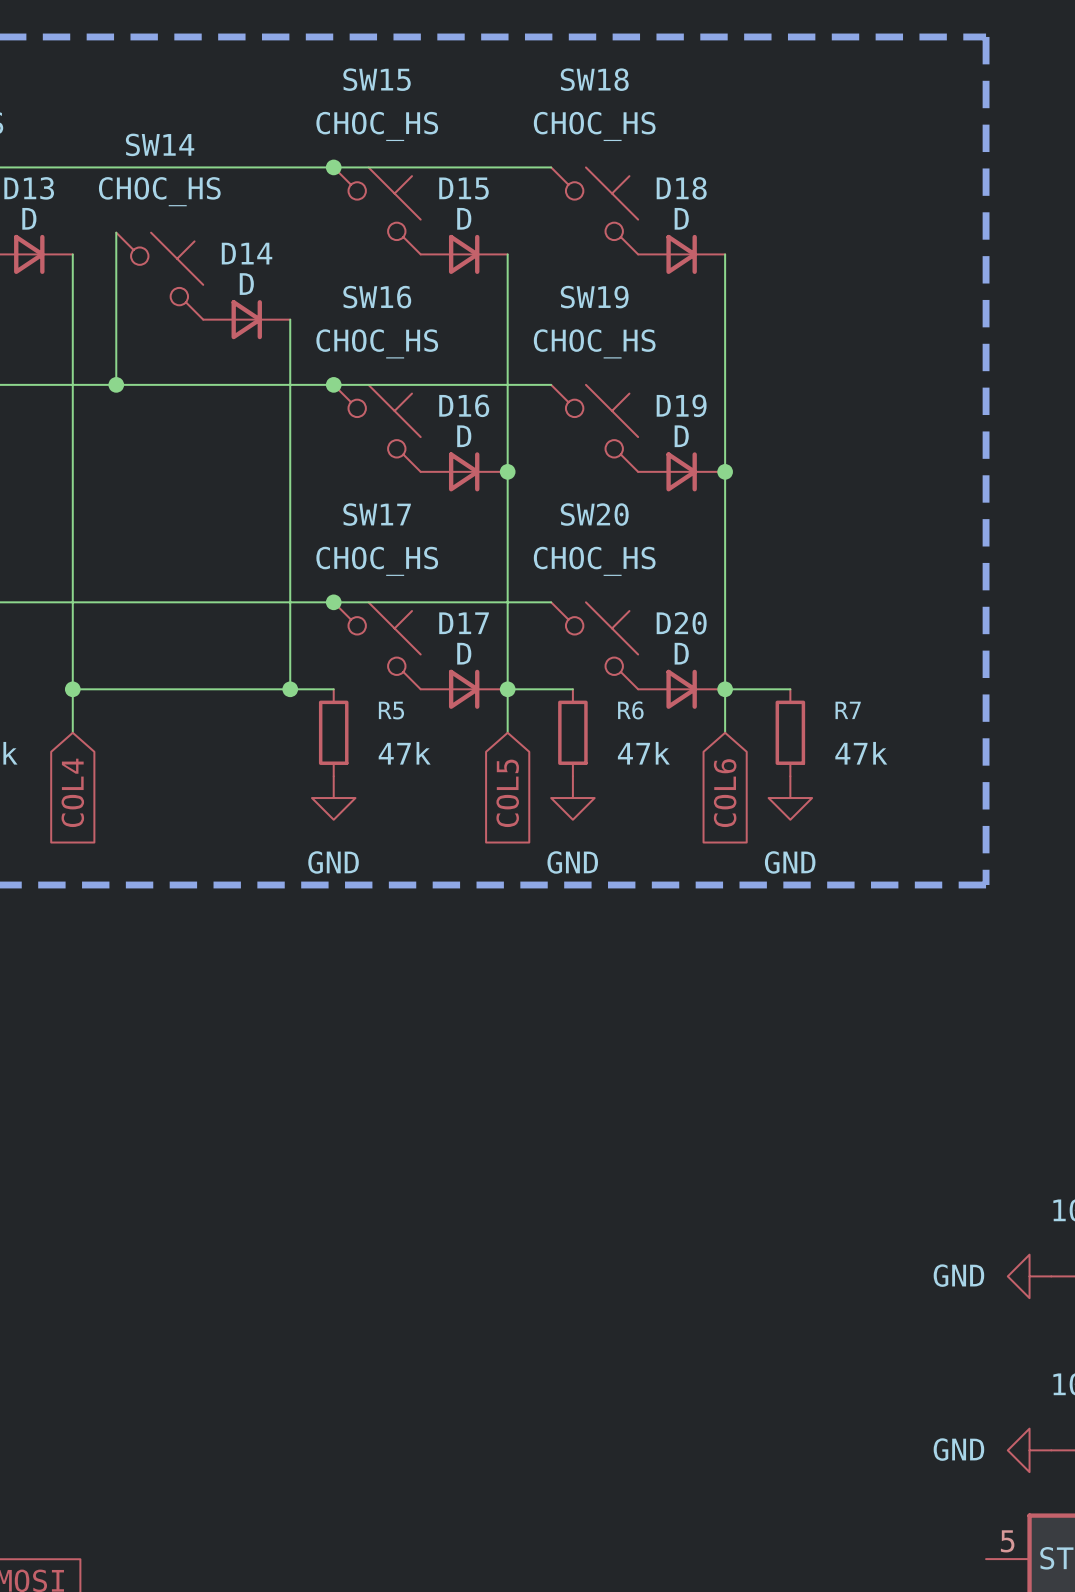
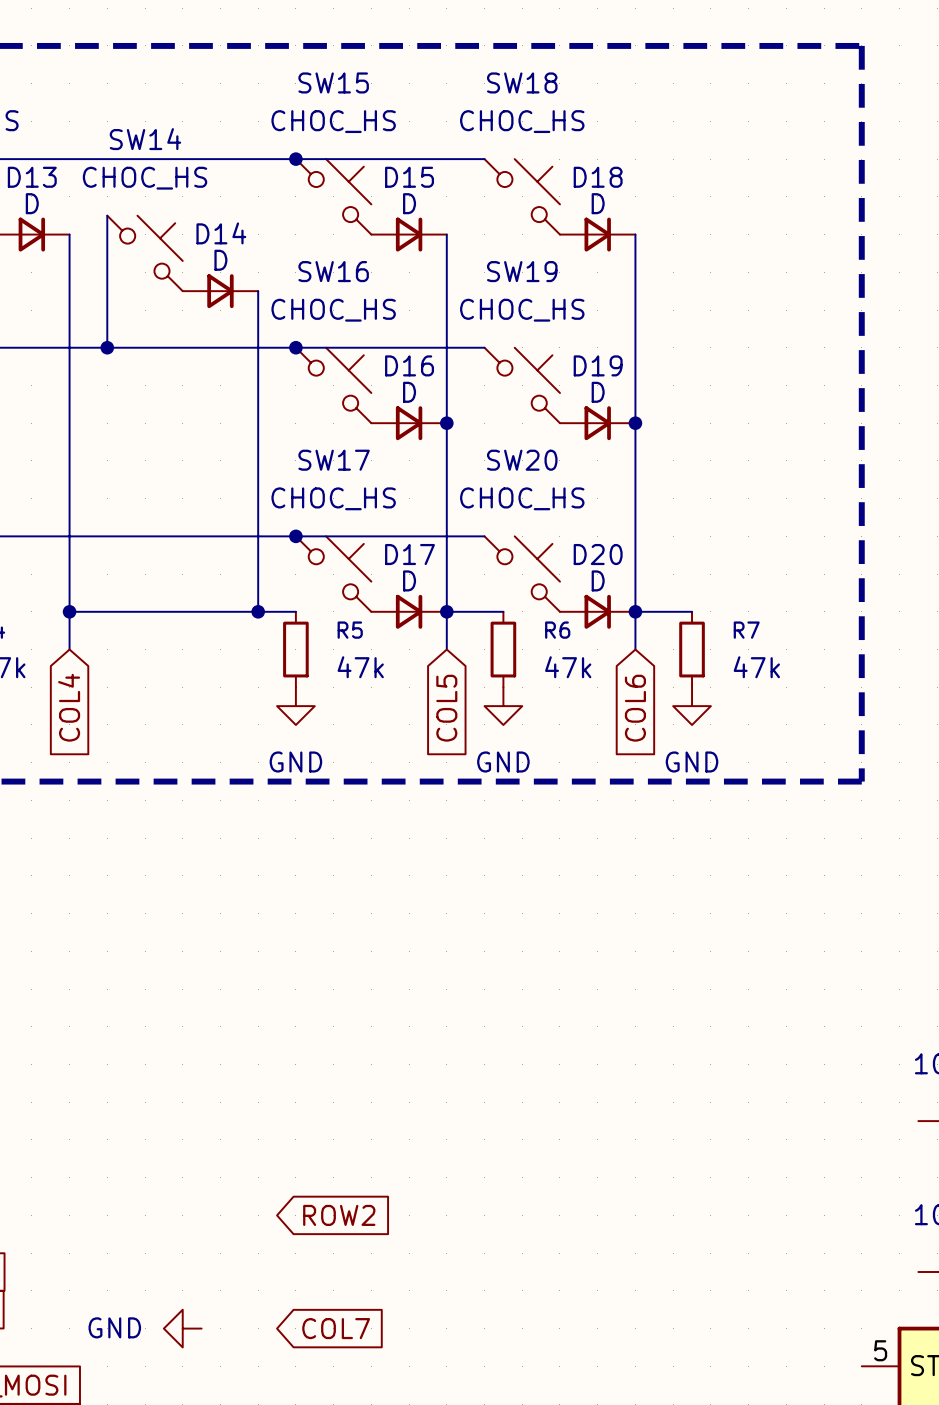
power symbol: GND (1029, 1276) -> none
global label: none -> ROW2 (339, 1215)
power symbol: GND (1029, 1450) -> none
power symbol: none -> GND (182, 1328)
global label: none -> COL7 (336, 1328)

